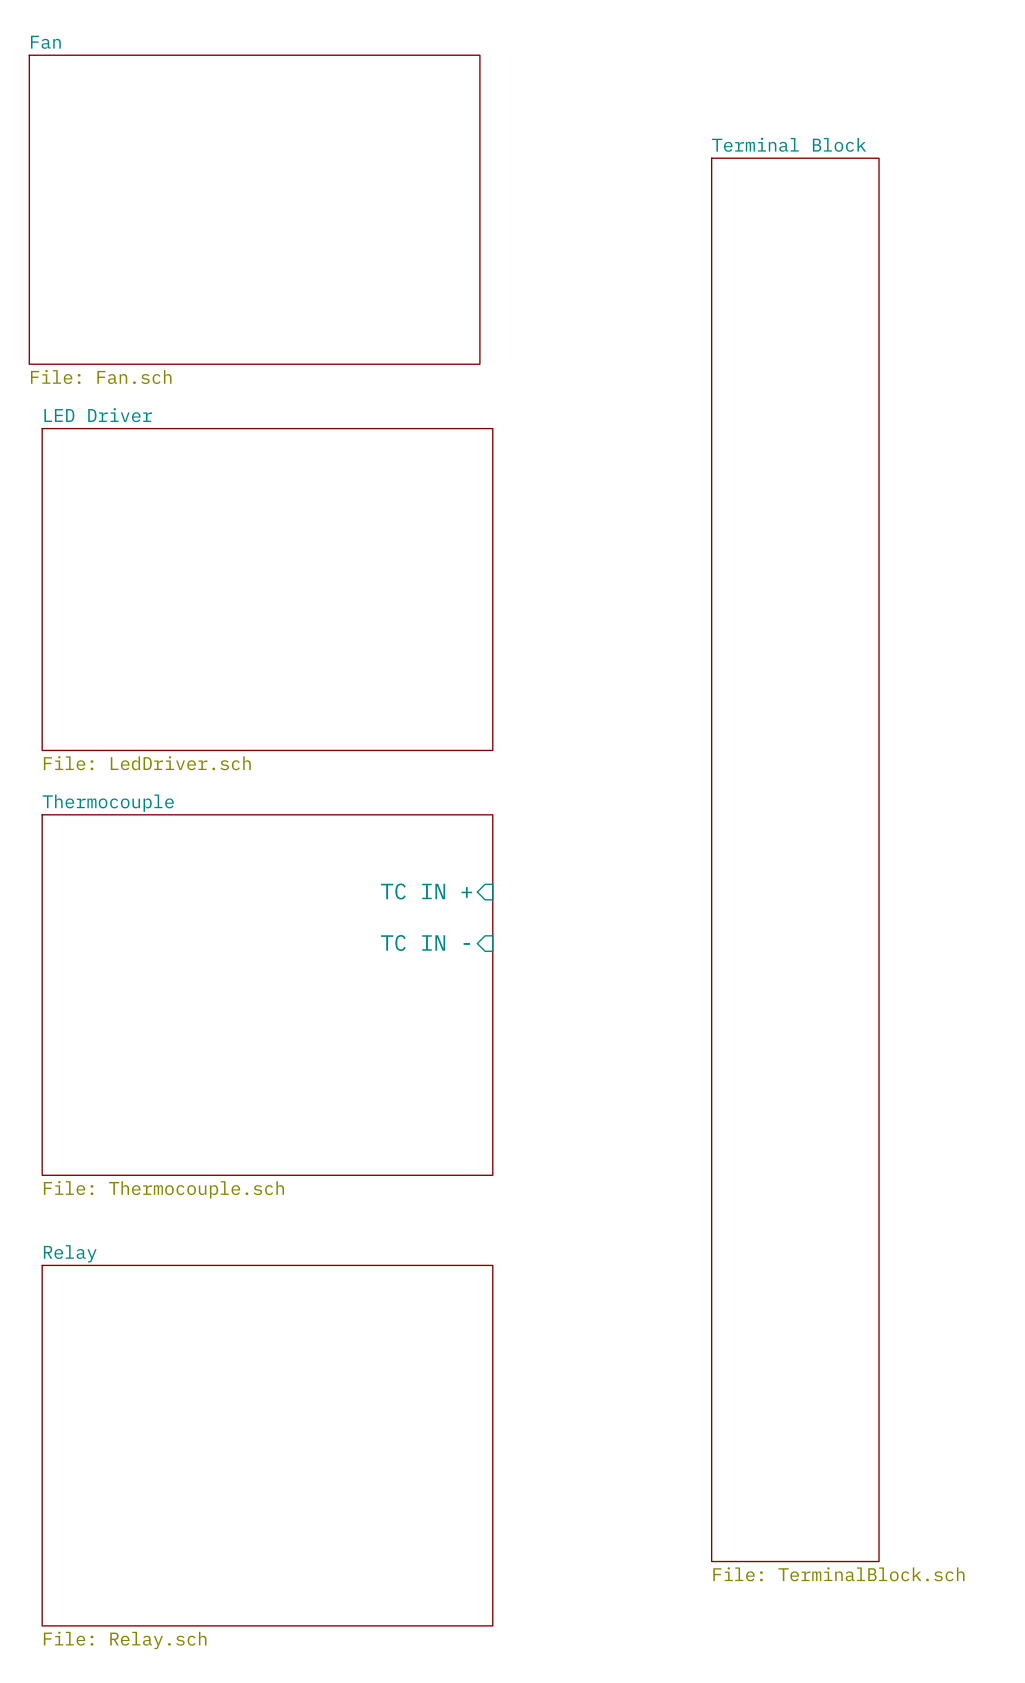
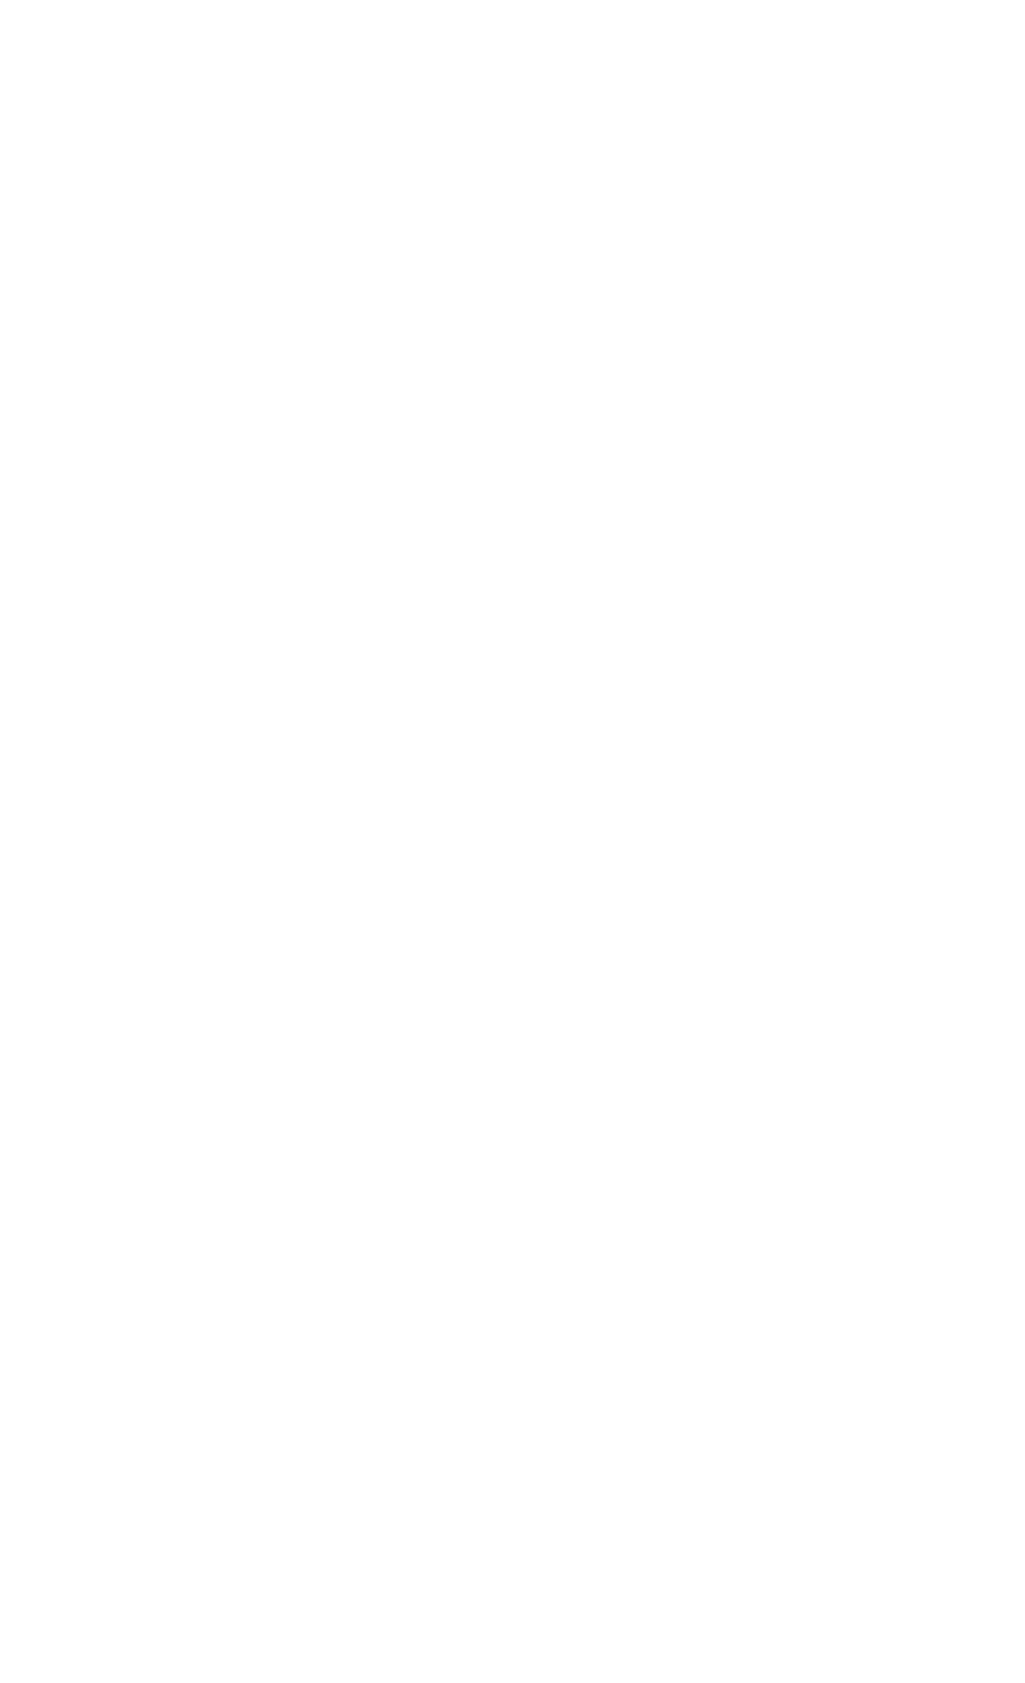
sheet Fan: File: Fan.sch (254, 209) -> none
sheet LED Driver: File: LedDriver.sch (267, 589) -> none
sheet Terminal Block: File: TerminalBlock.sch (795, 859) -> none
sheet pin: TC IN + (426, 891) -> none
sheet pin: TC IN - (425, 942) -> none
sheet Thermocouple: File: Thermocouple.sch (267, 995) -> none
sheet Relay: File: Relay.sch (267, 1445) -> none

